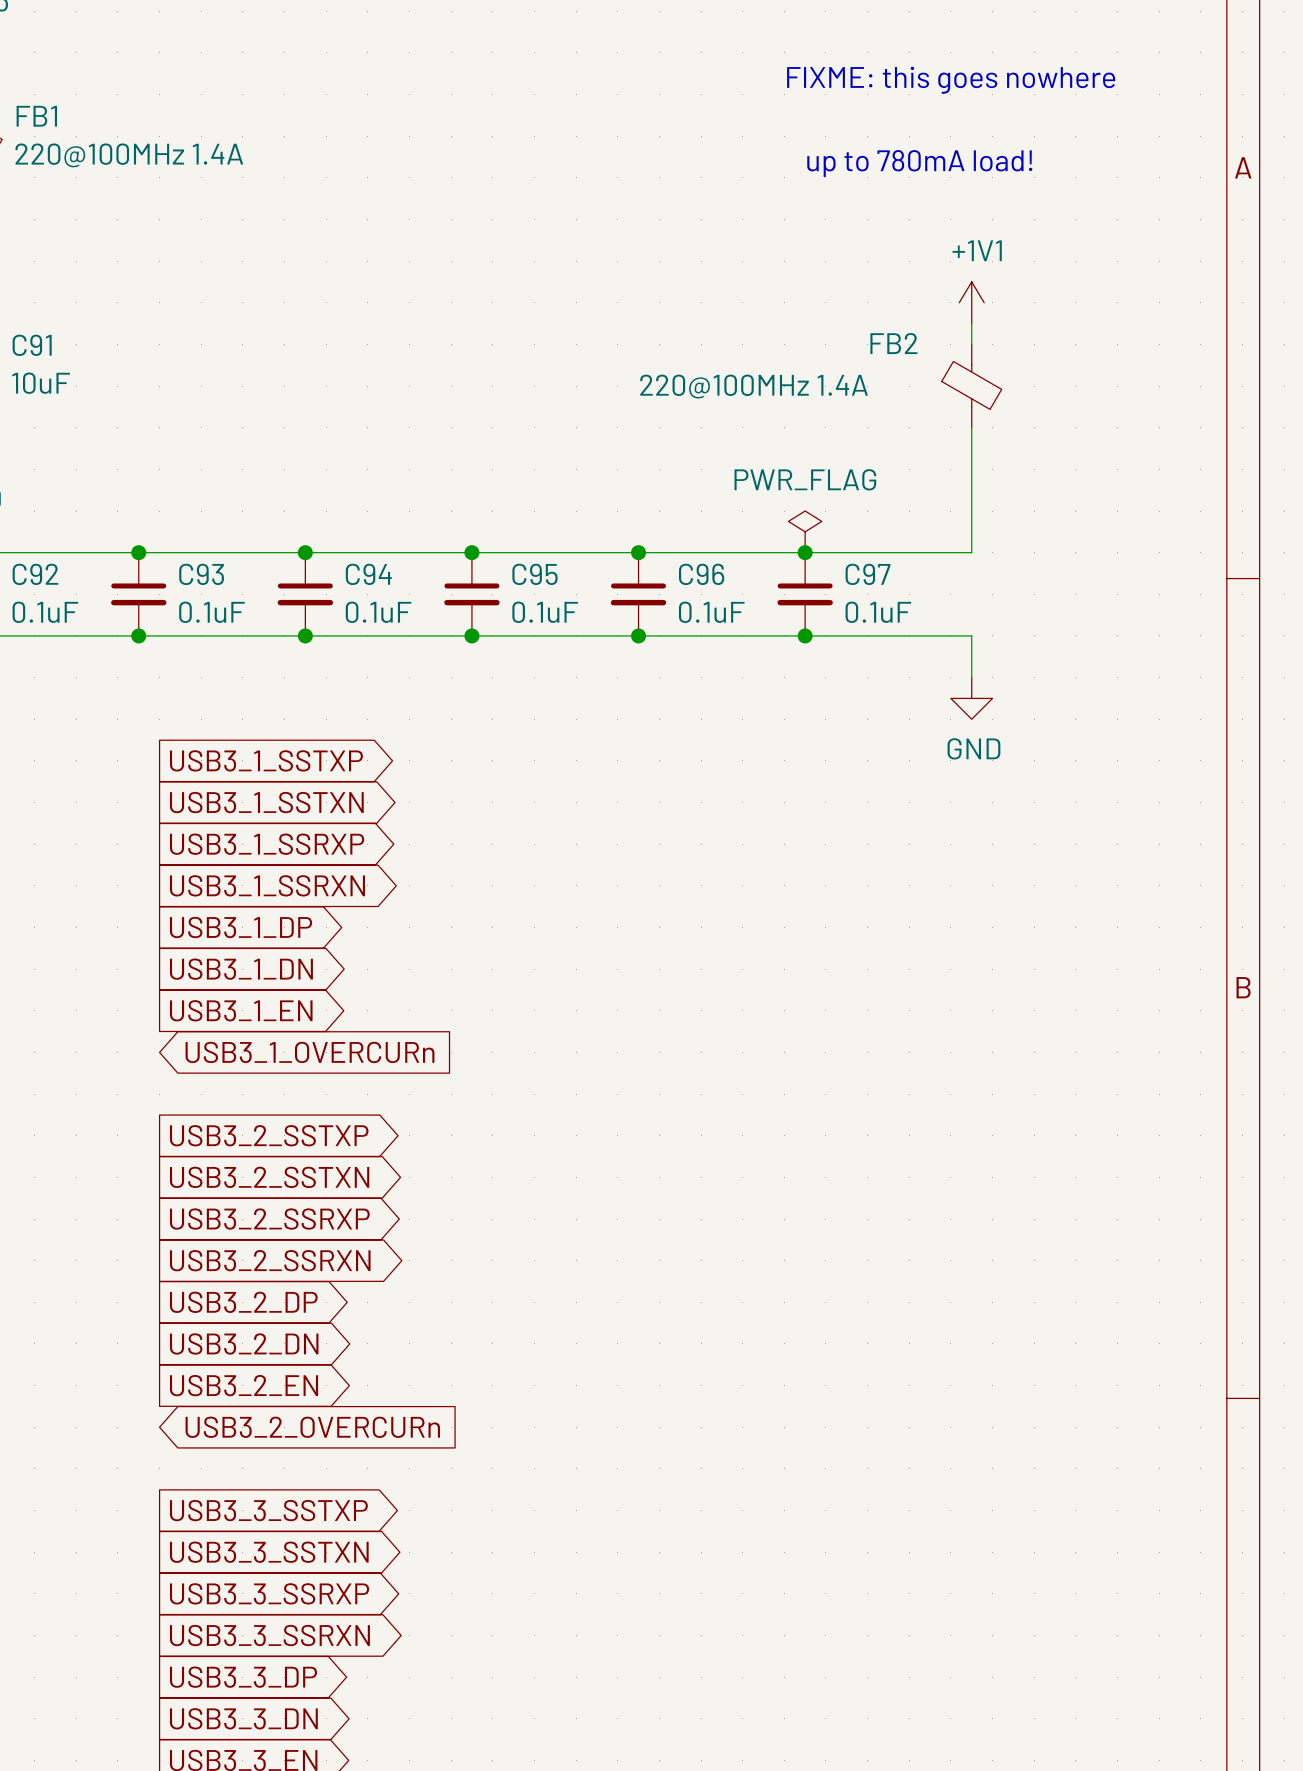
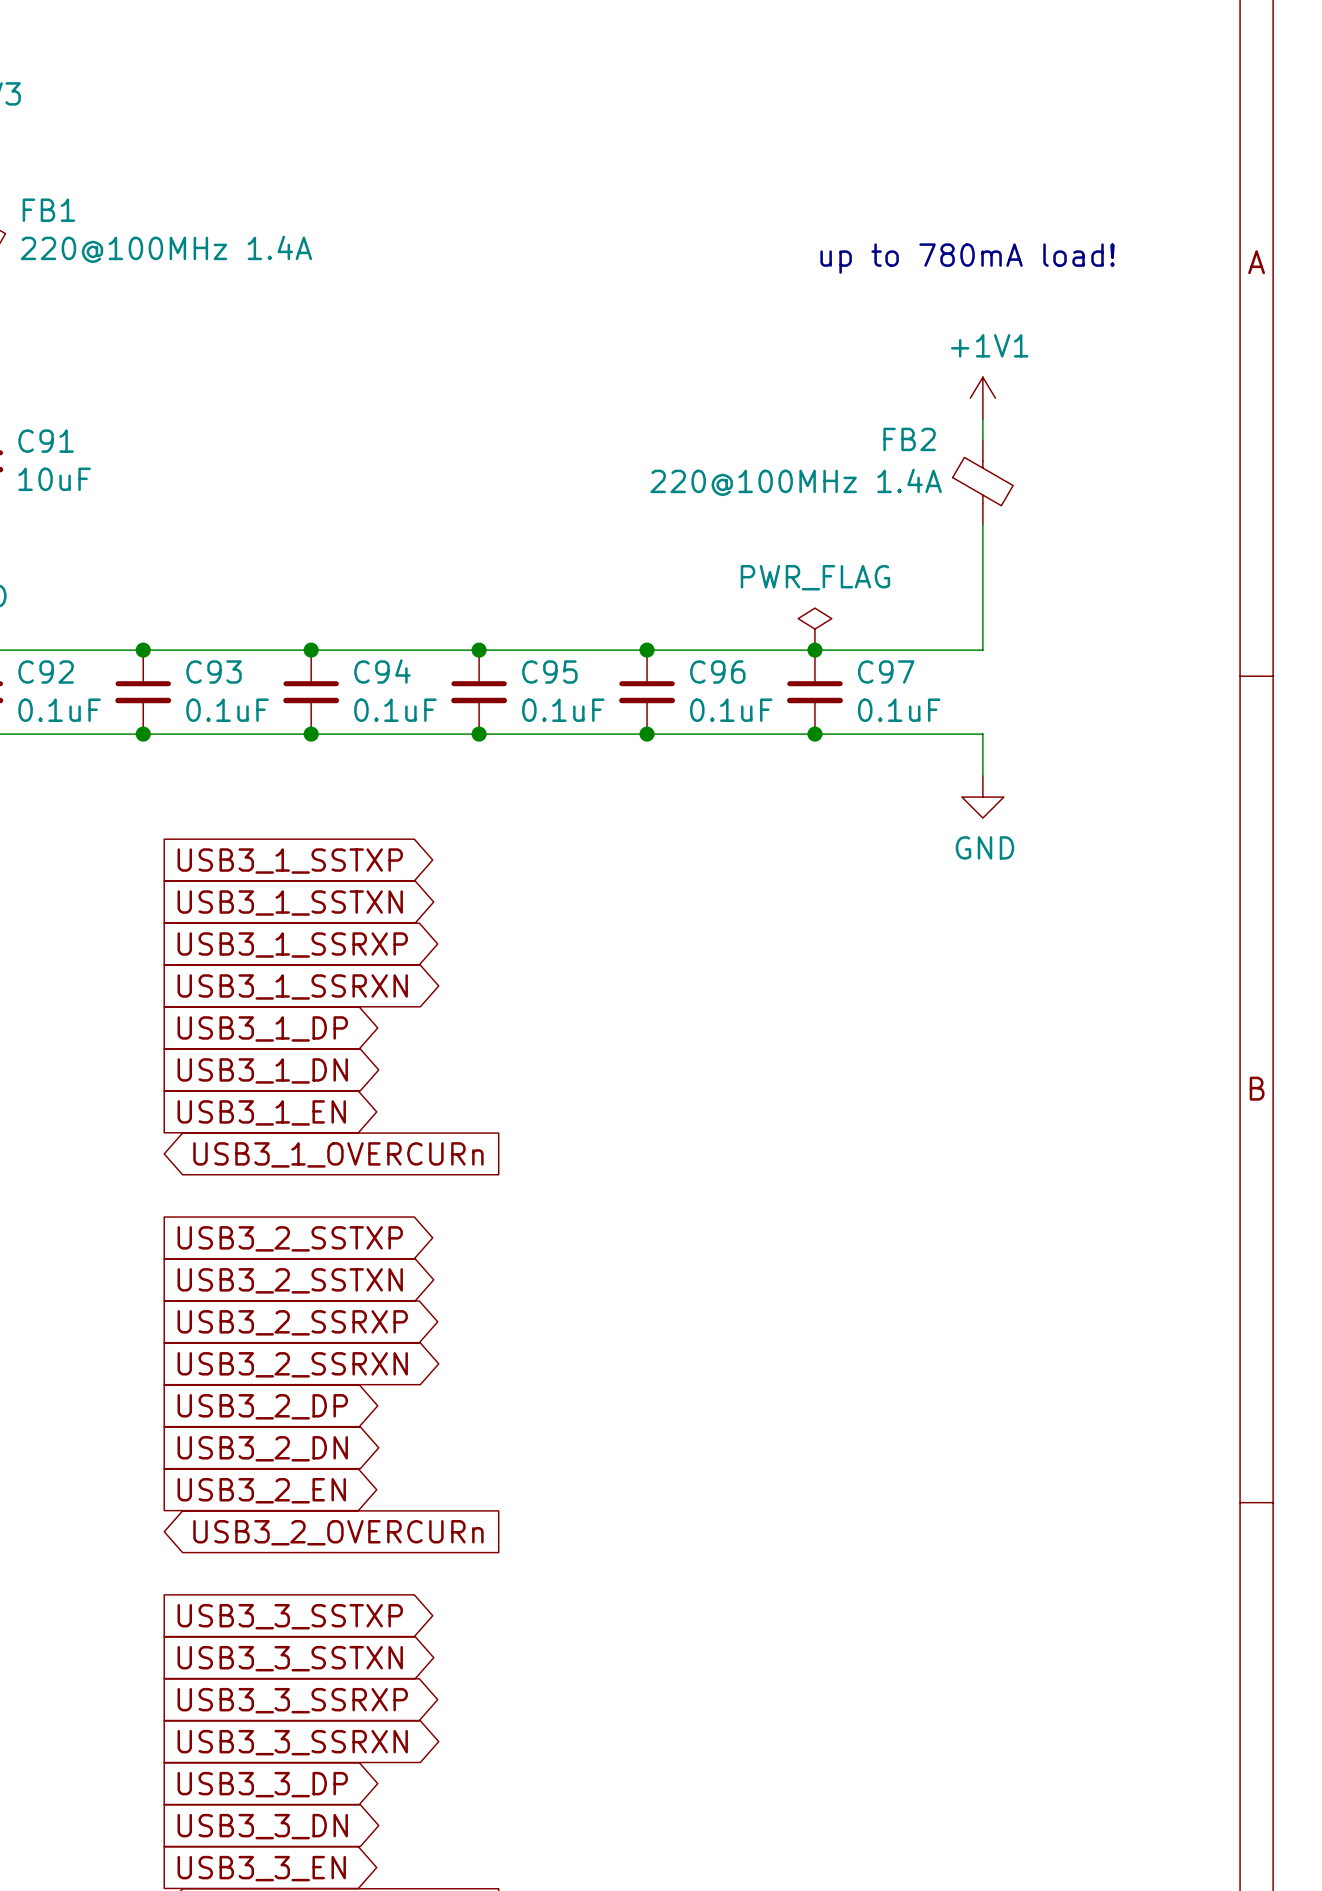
text: FIXME: this goes nowhere (951, 80) -> none

